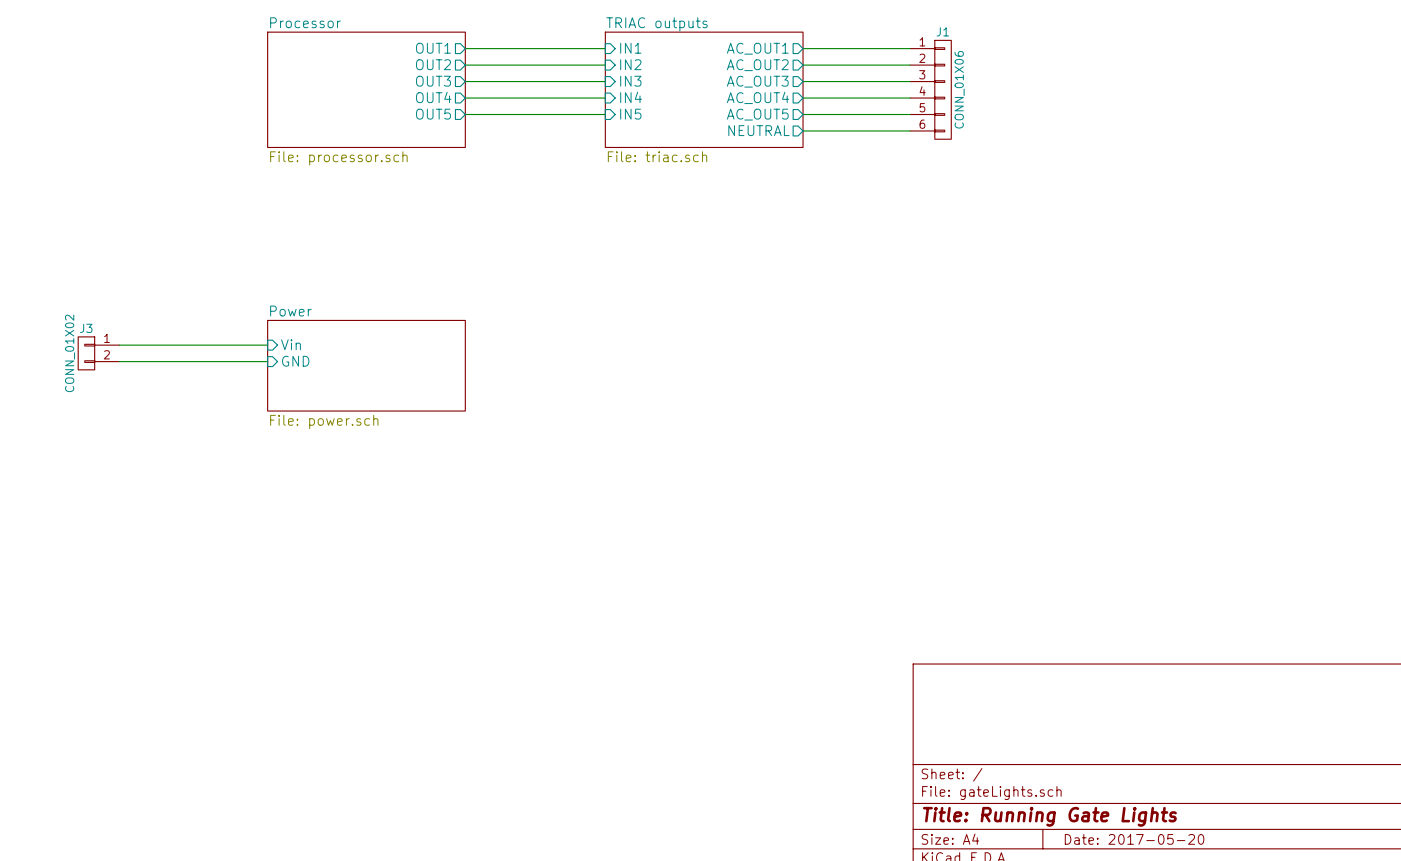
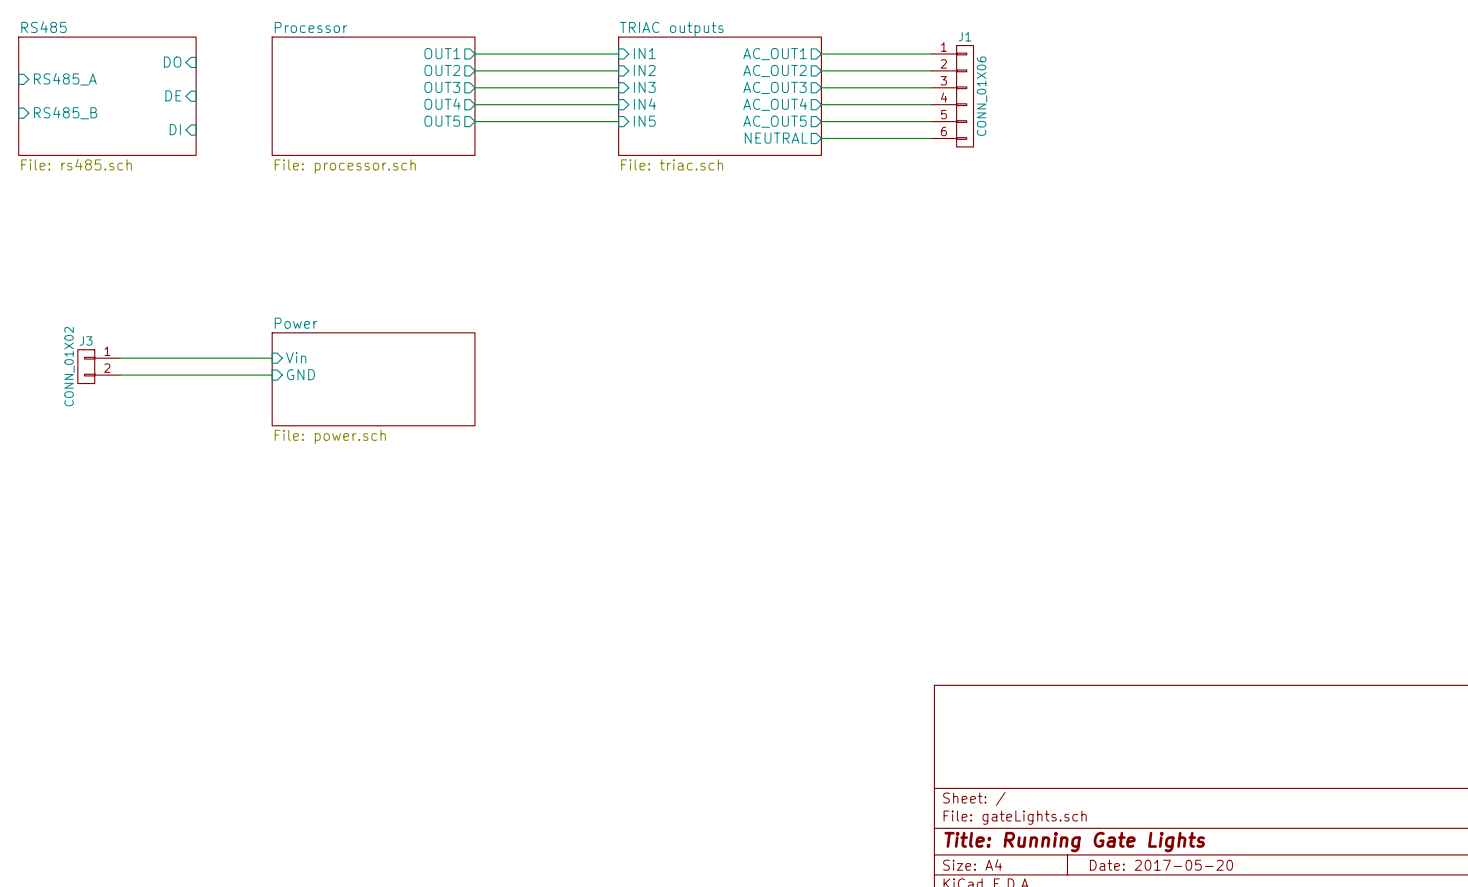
sheet pin: none -> DO (172, 62)
sheet pin: none -> RS485_A (65, 79)
sheet RS485: none -> File: rs485.sch (107, 96)
sheet pin: none -> DE (173, 95)
sheet pin: none -> RS485_B (65, 113)
sheet pin: none -> DI (175, 129)

